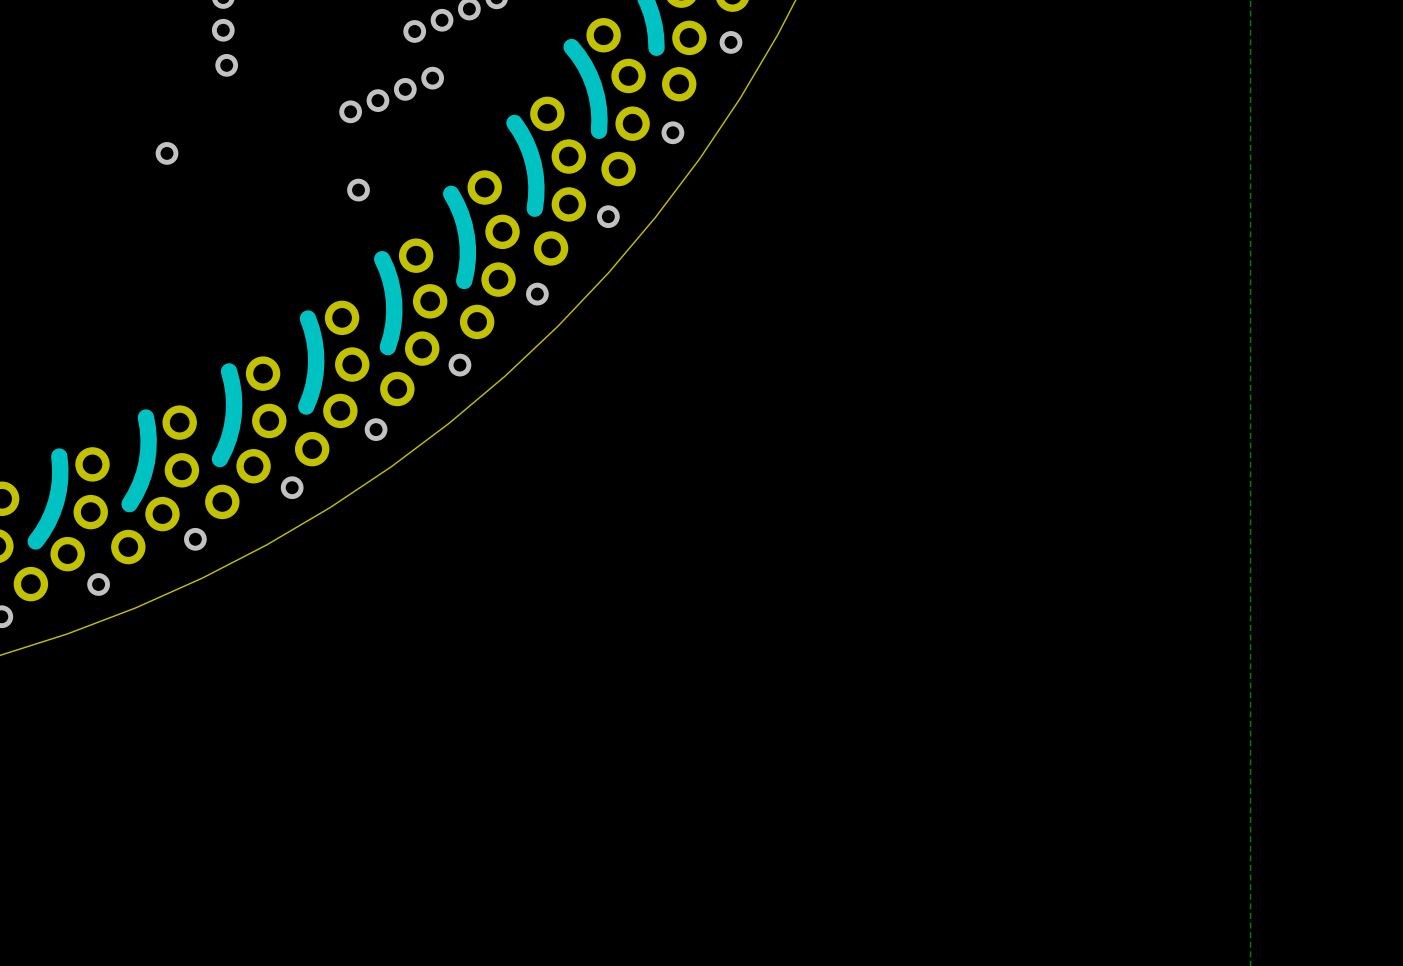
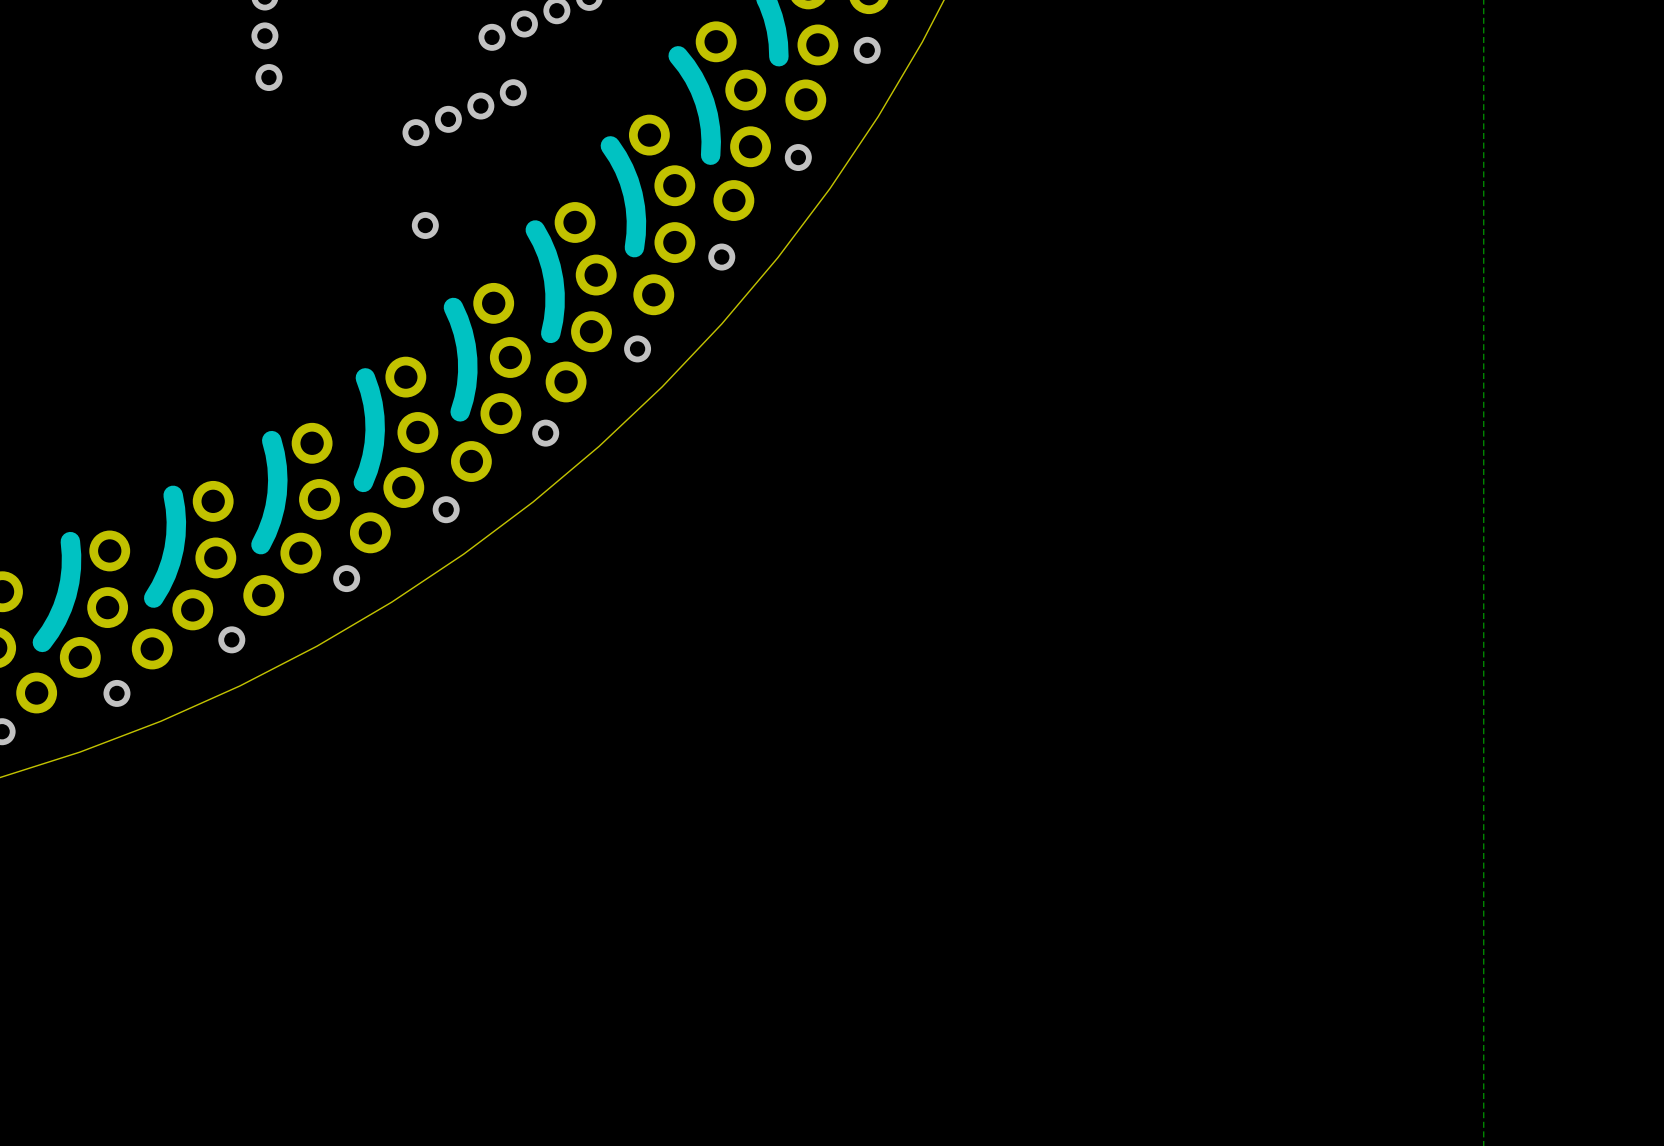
via: (166, 153) -> none

